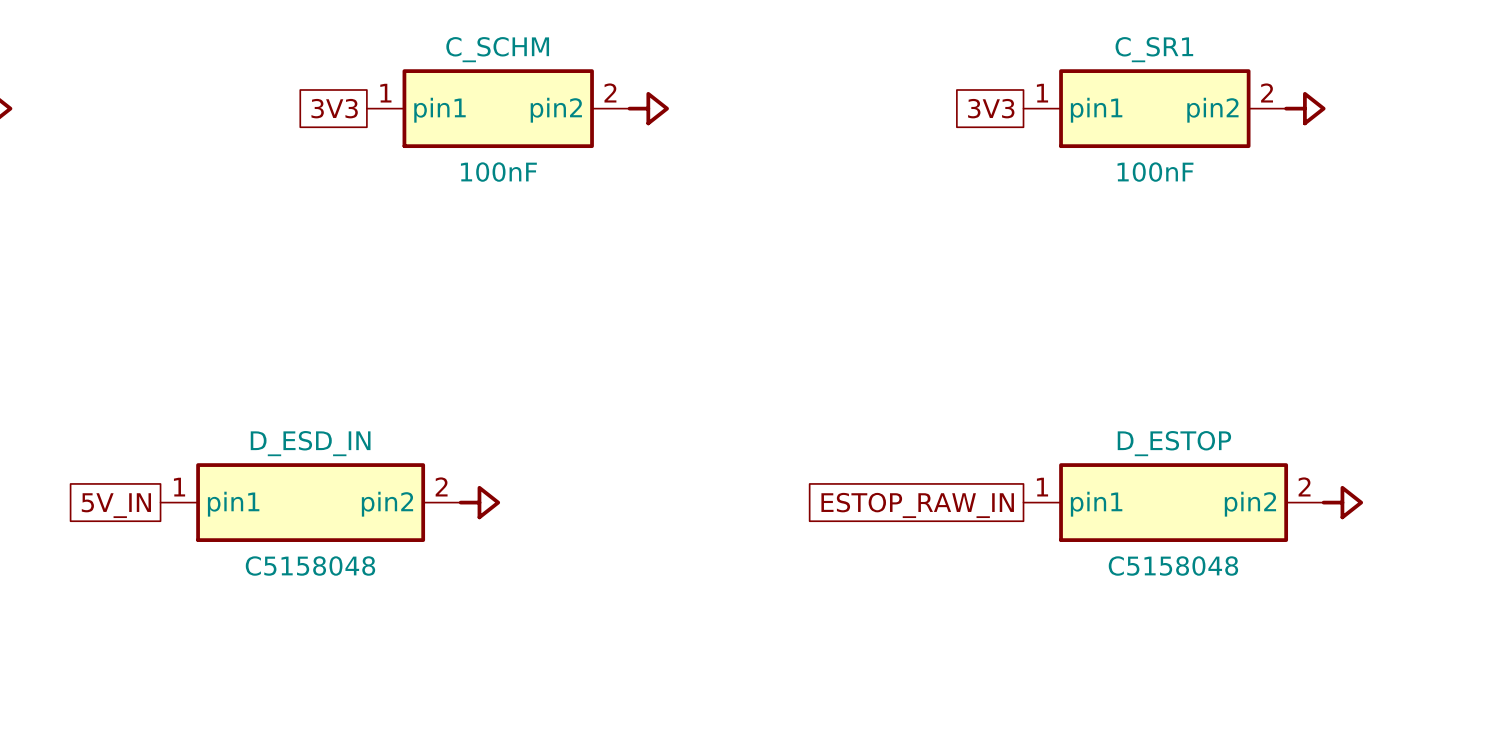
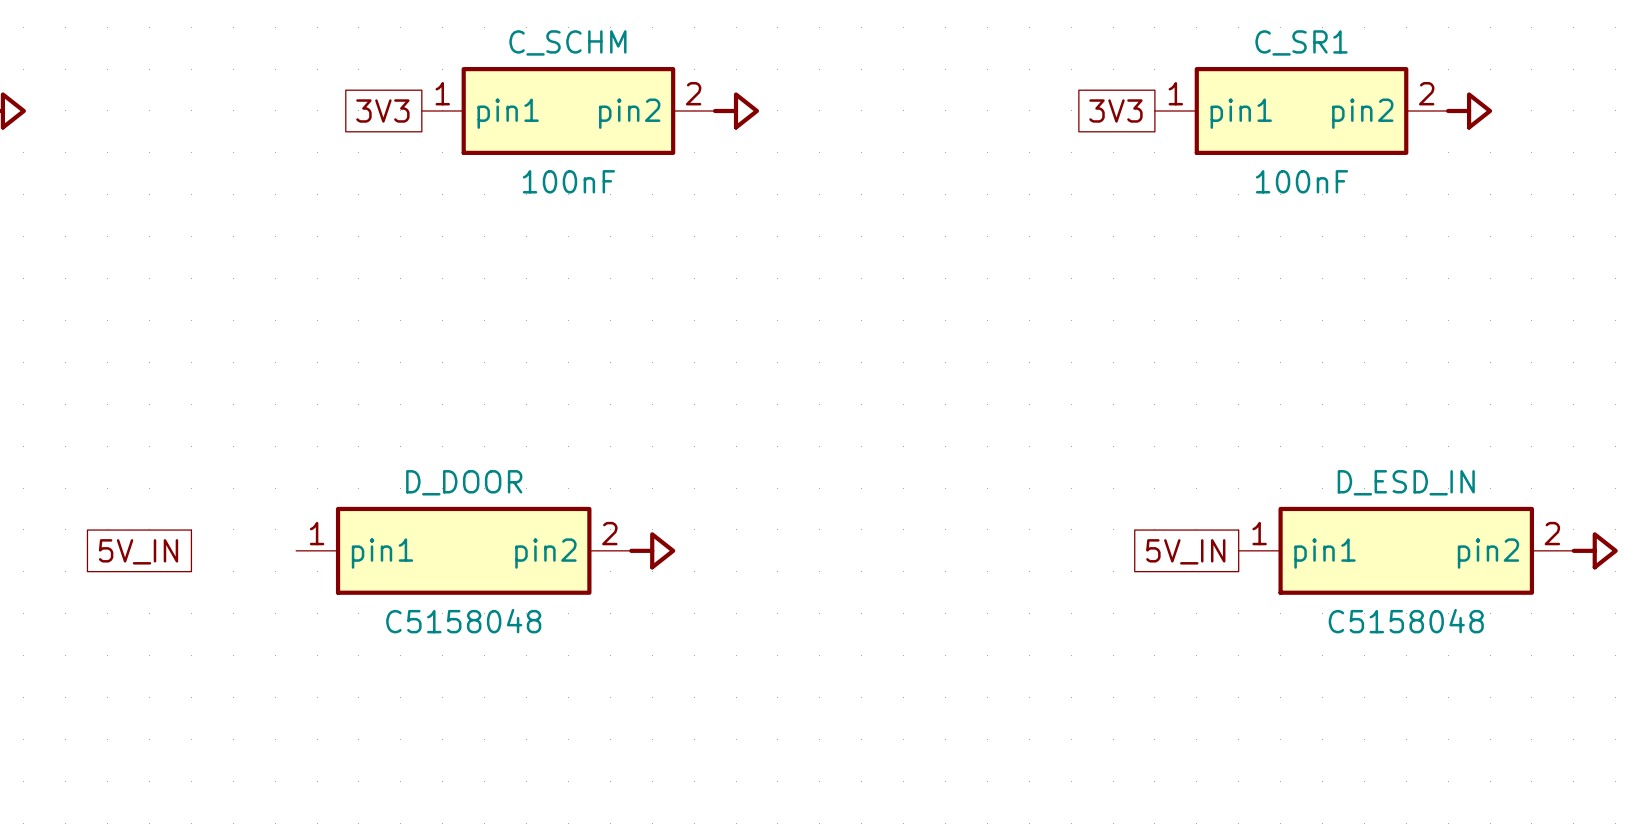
D_ESD_IN: C5158048 (310, 502) -> none
D_DOOR: none -> C5158048 (463, 550)
power symbol position: (479, 502) -> (652, 550)
D_ESTOP: C5158048 (1173, 502) -> none
D_ESD_IN: none -> C5158048 (1406, 550)
power symbol position: (1342, 502) -> (1594, 550)
global label: ESTOP_RAW_IN (917, 505) -> none
global label: none -> 5V_IN (1185, 551)

